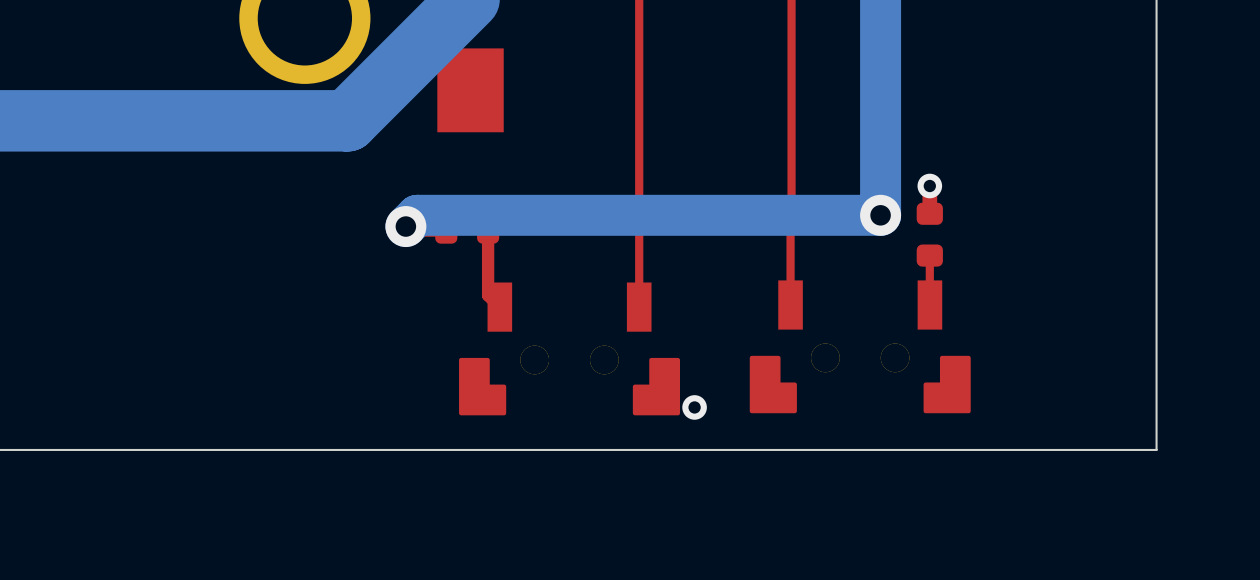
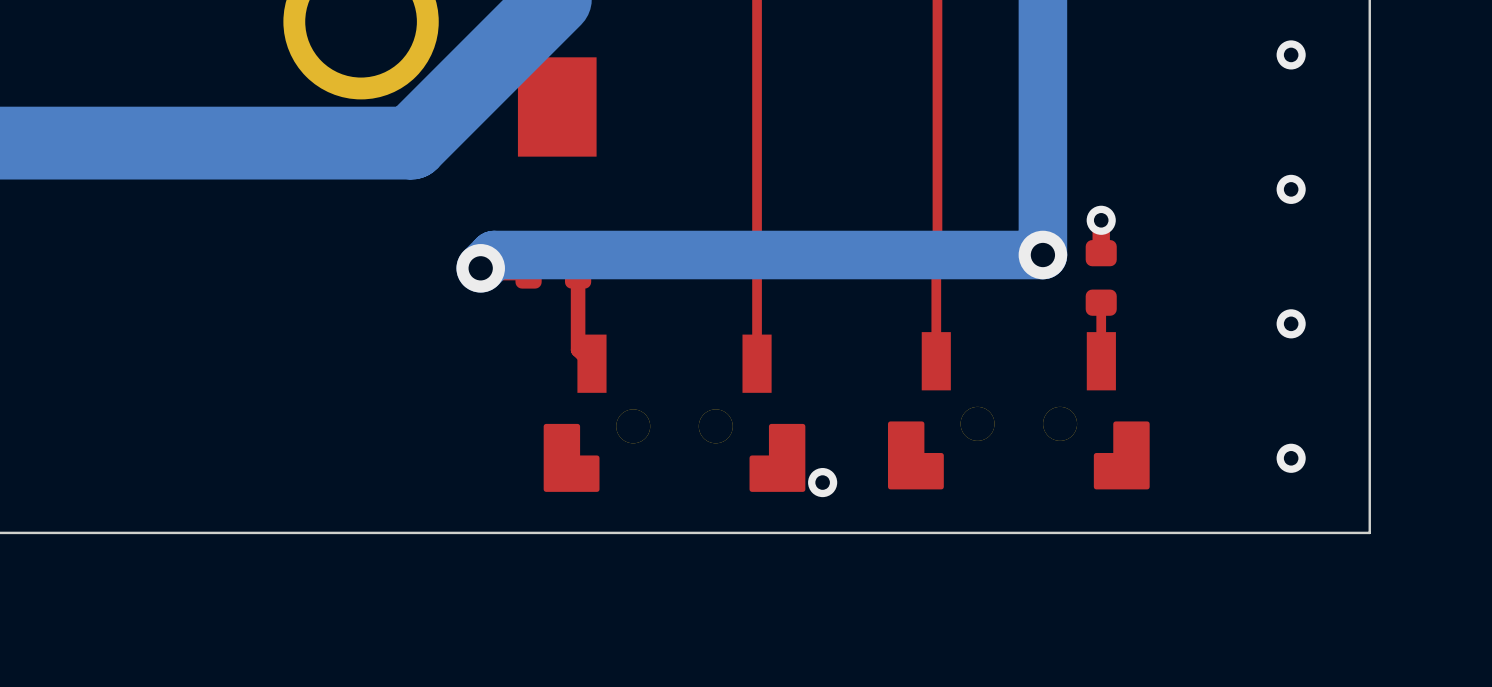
via: none -> (1291, 54)
via: none -> (1291, 189)
via: none -> (1291, 323)
via: none -> (1291, 458)

